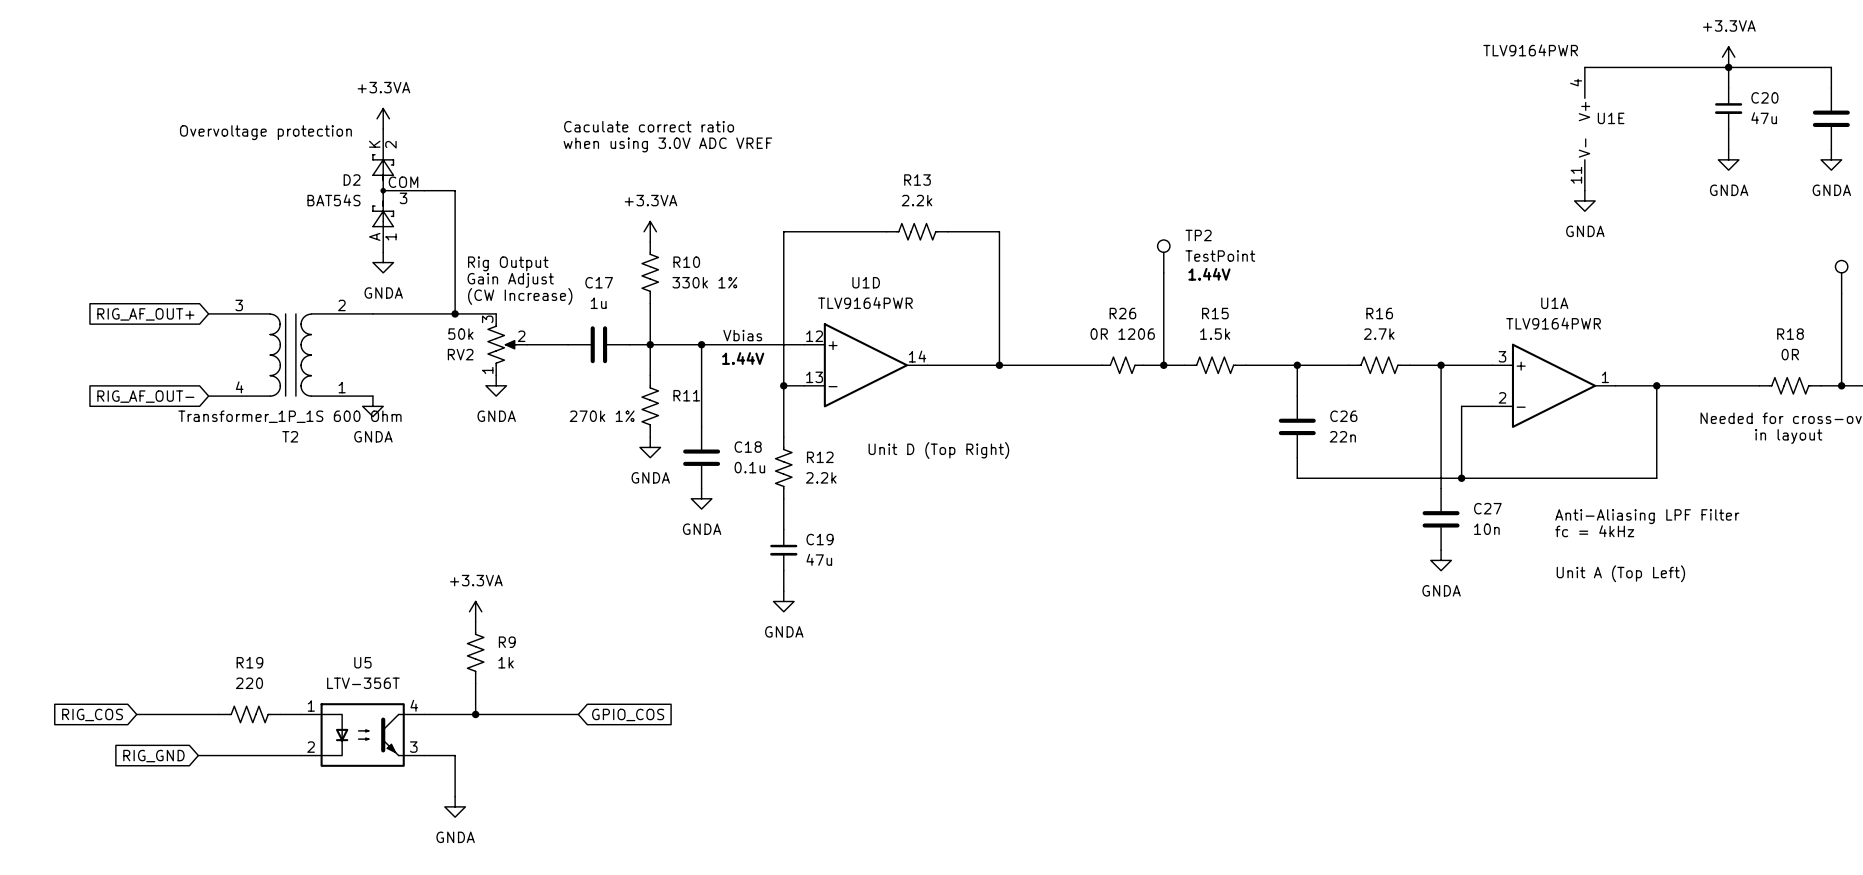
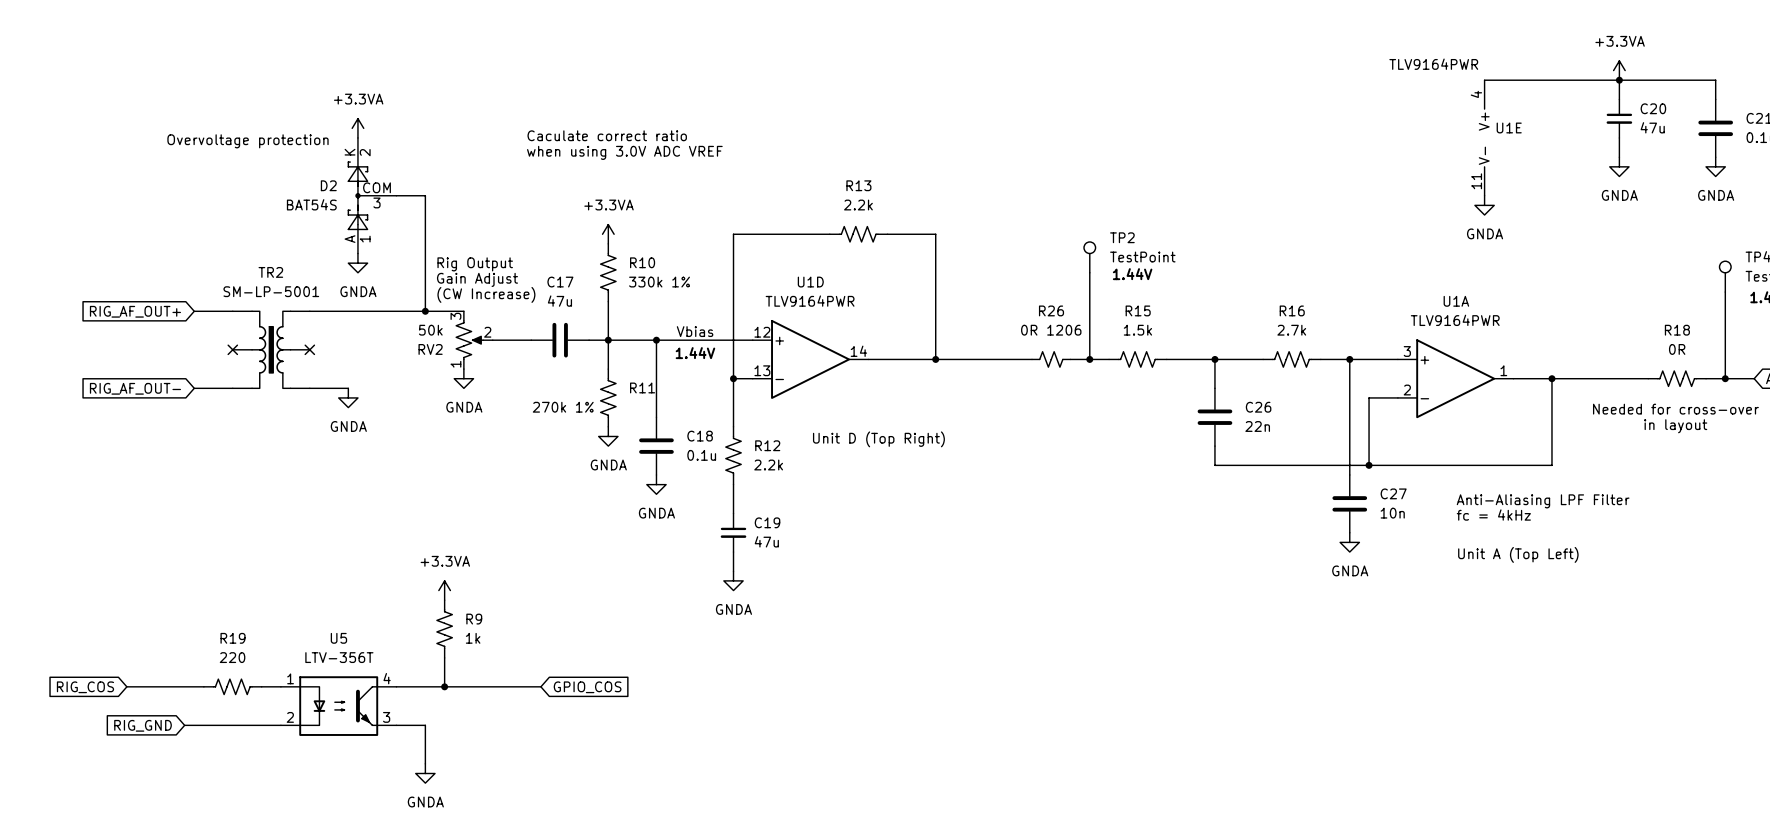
C17 value: 1u (598, 303) -> 47u (559, 301)
no-connect mark: none -> (232, 349)
T2: Transformer_1P_1S 600 Ohm (290, 355) -> none
TR2: none -> SM-LP-5001 (271, 349)
no-connect mark: none -> (309, 349)

